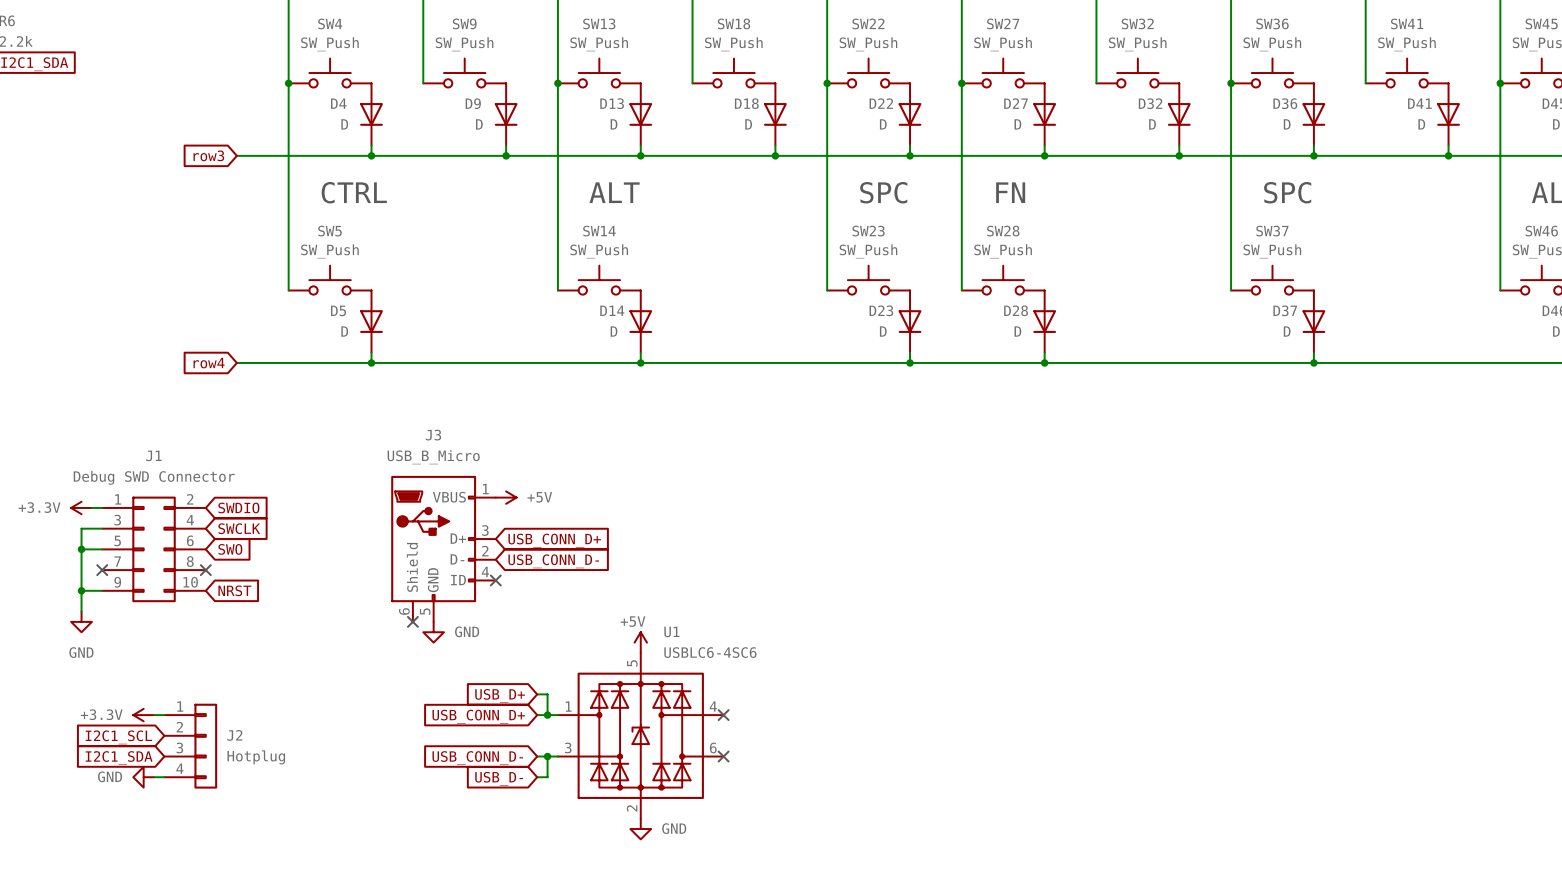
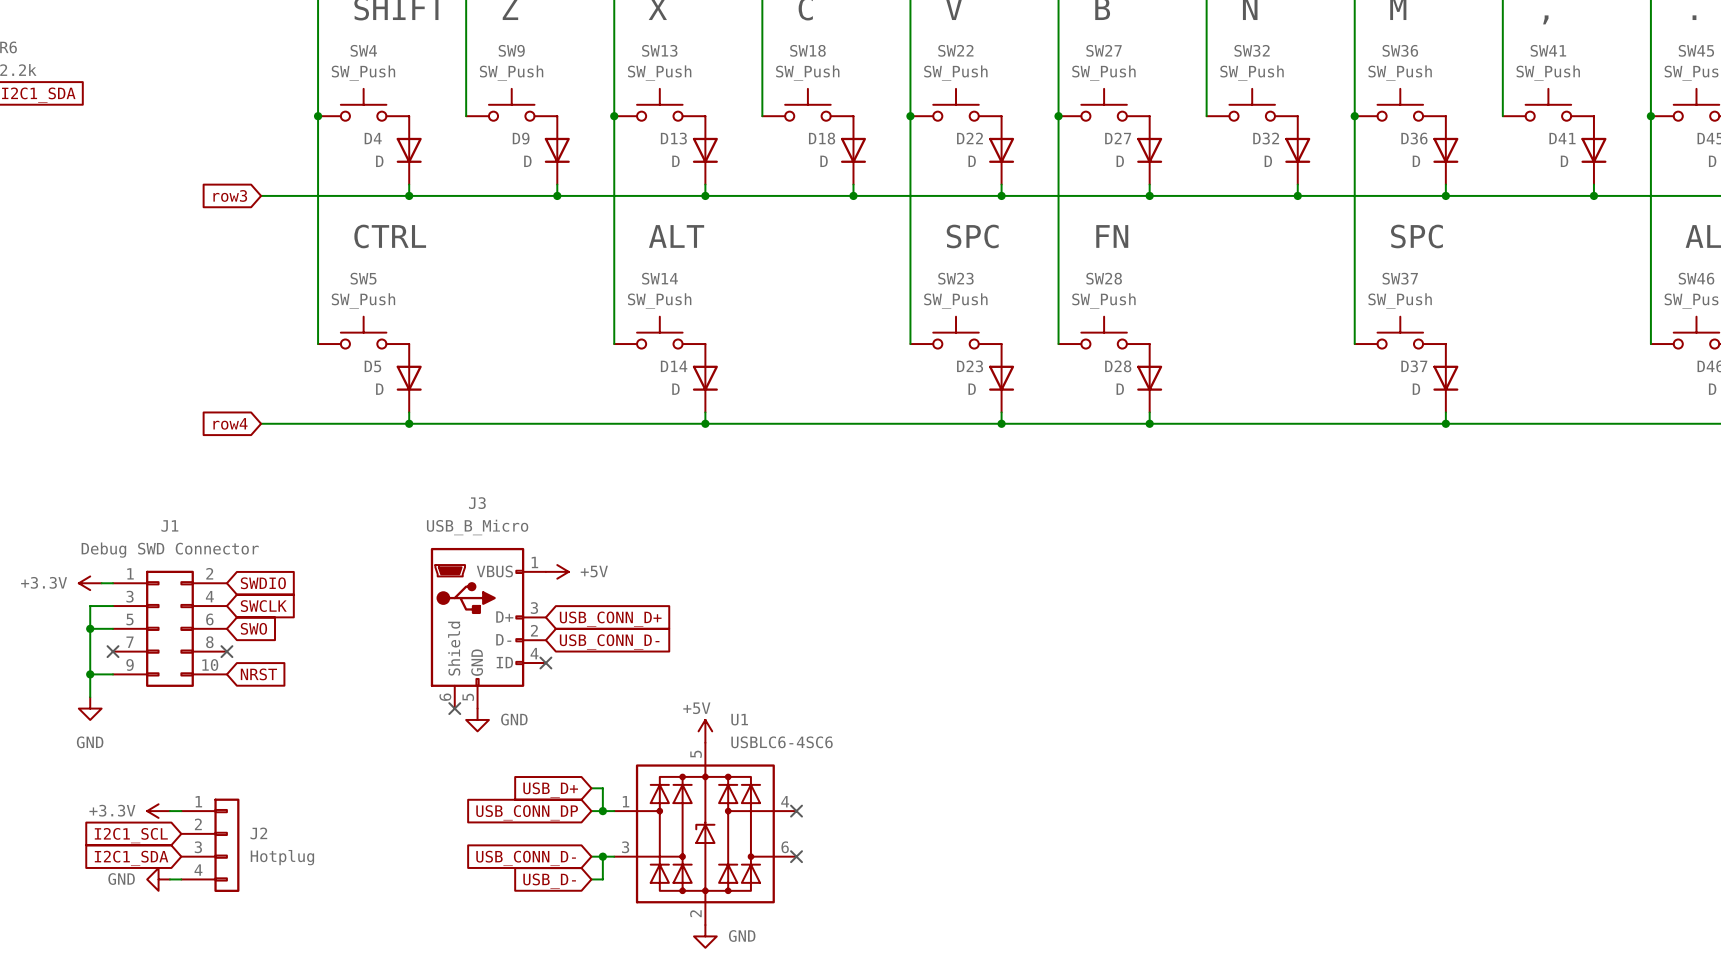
global label: USB_CONN_D+ (478, 716) -> USB_CONN_DP (527, 812)

